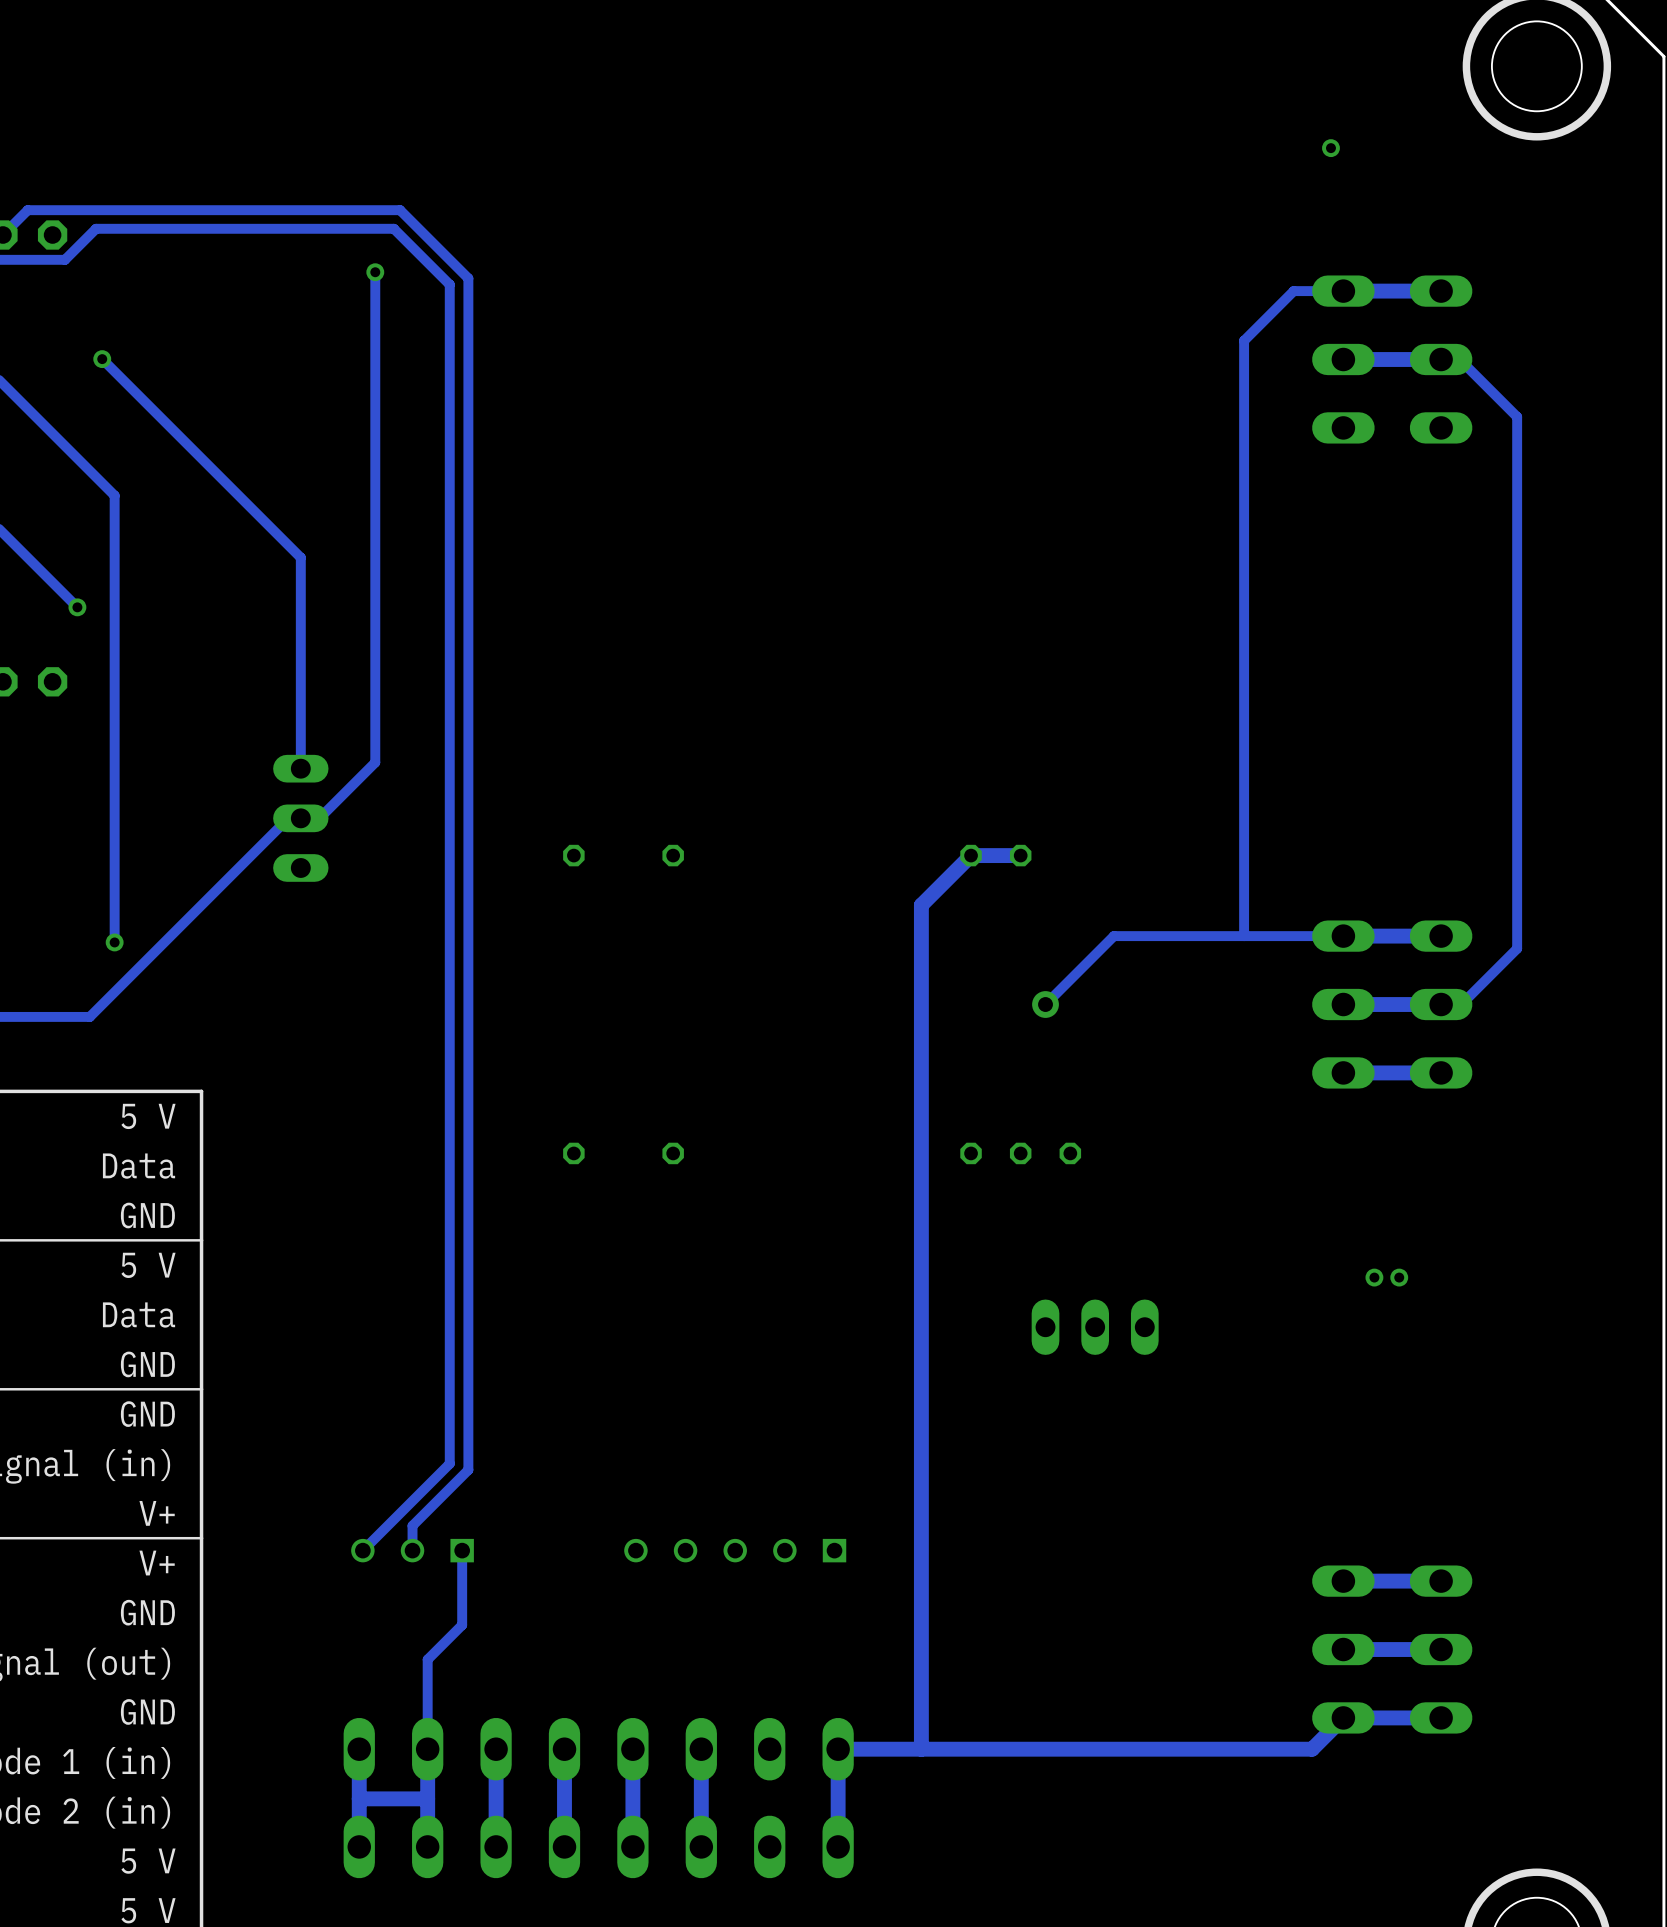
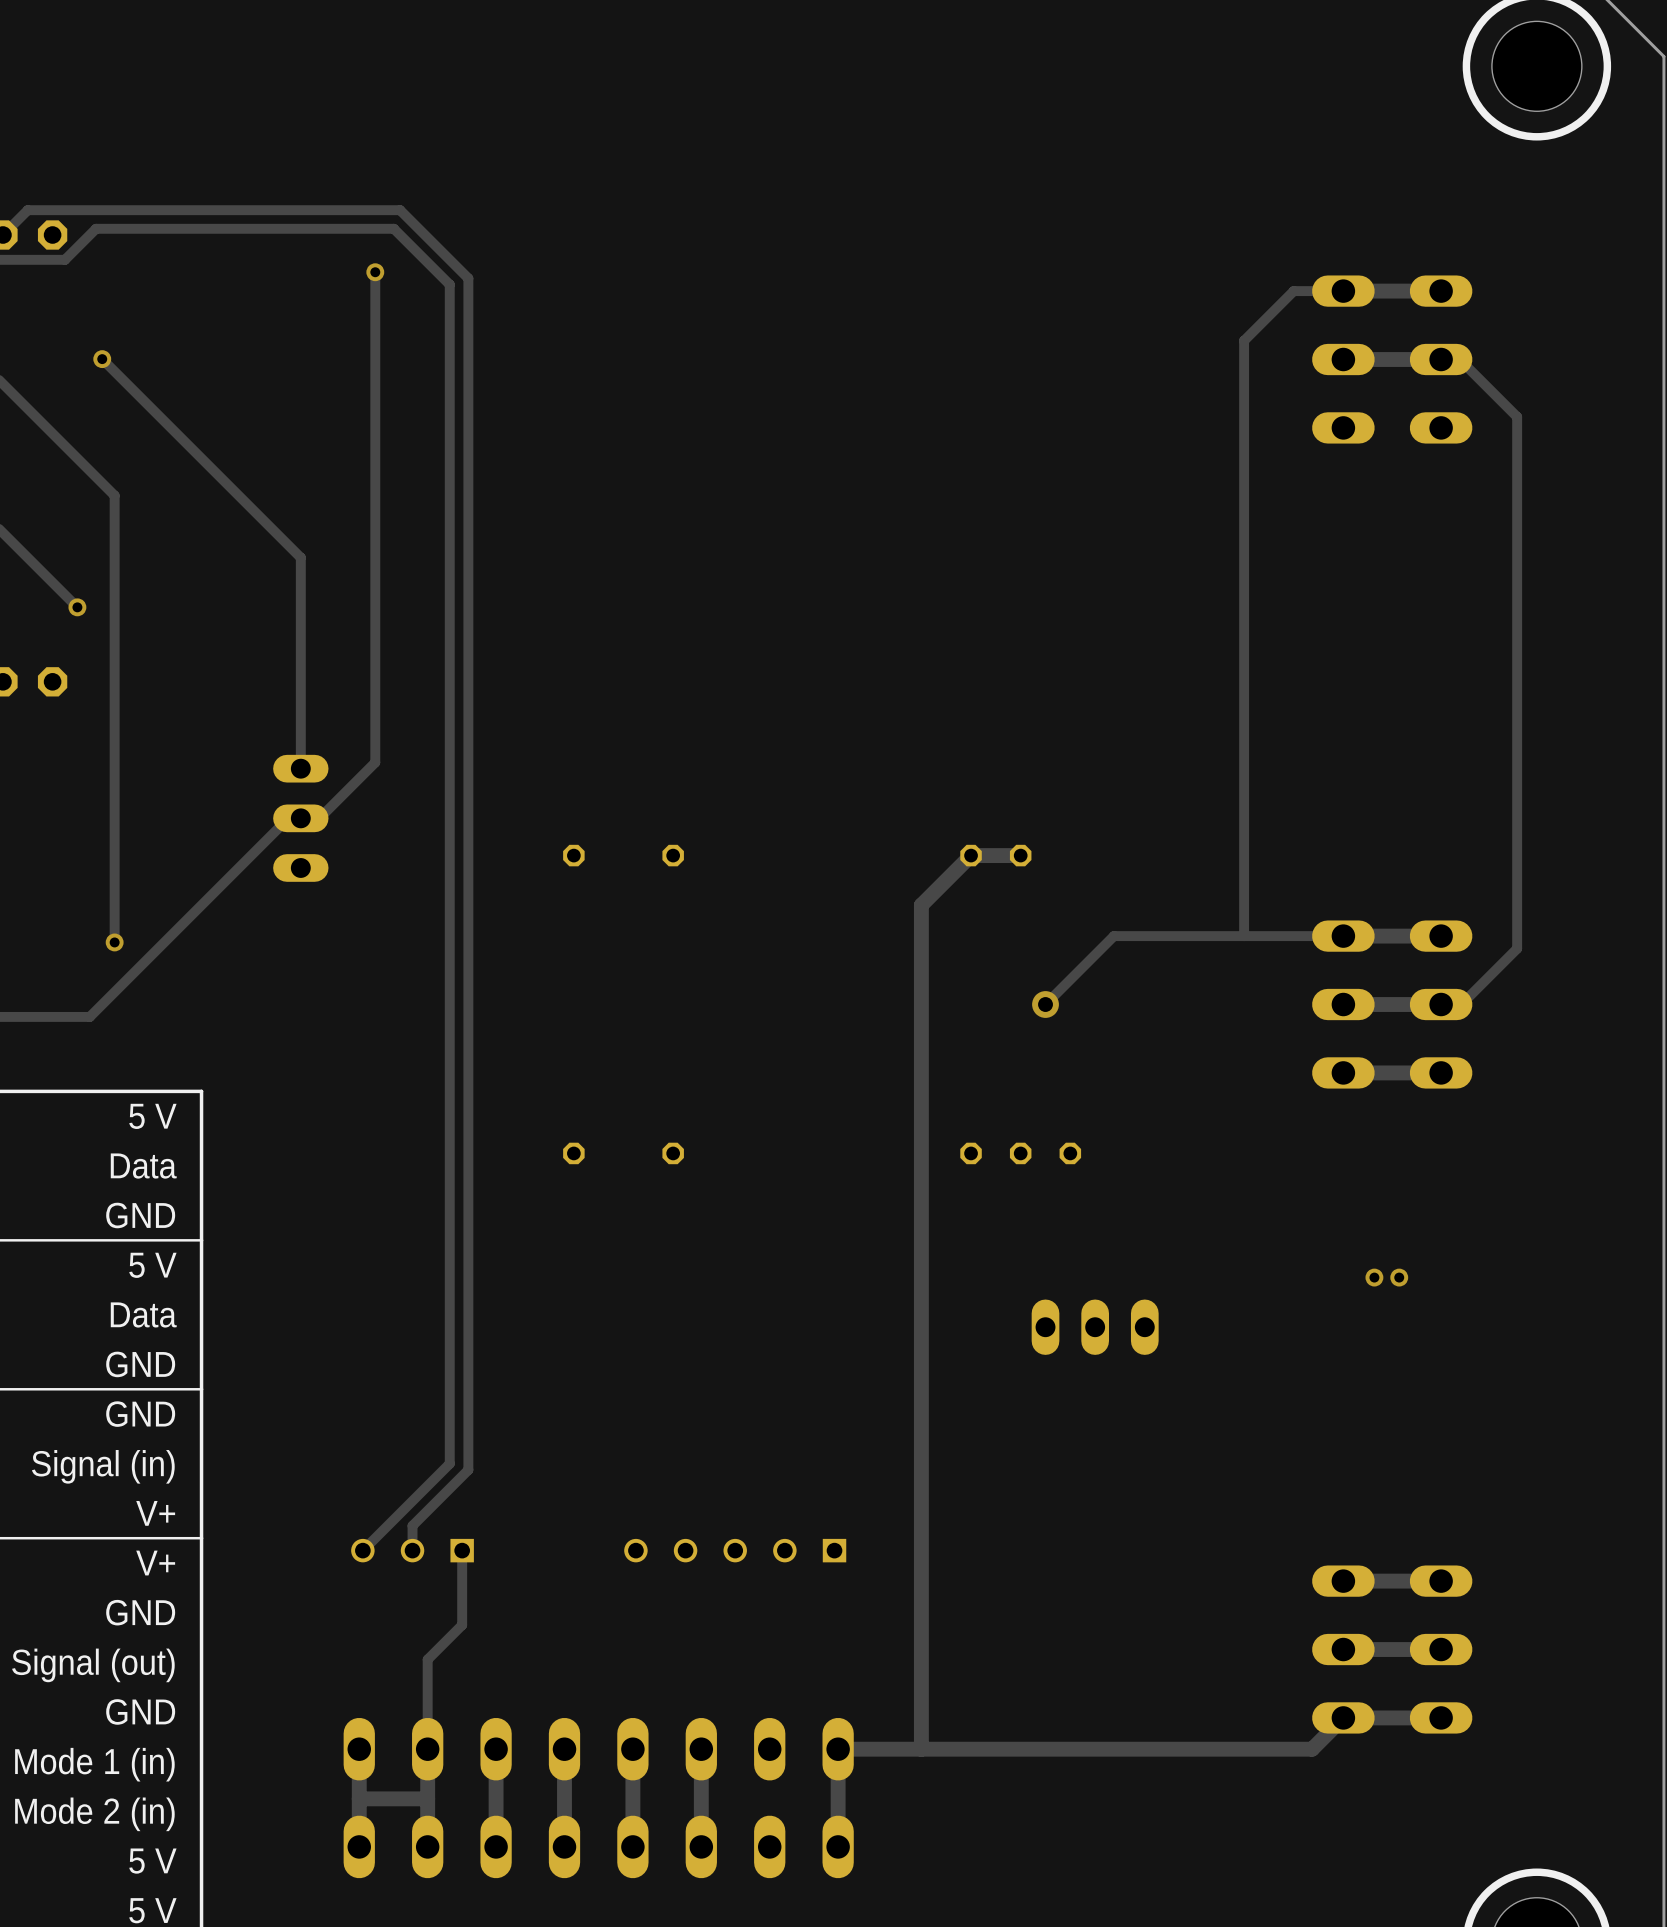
via: (1330, 148) -> none

